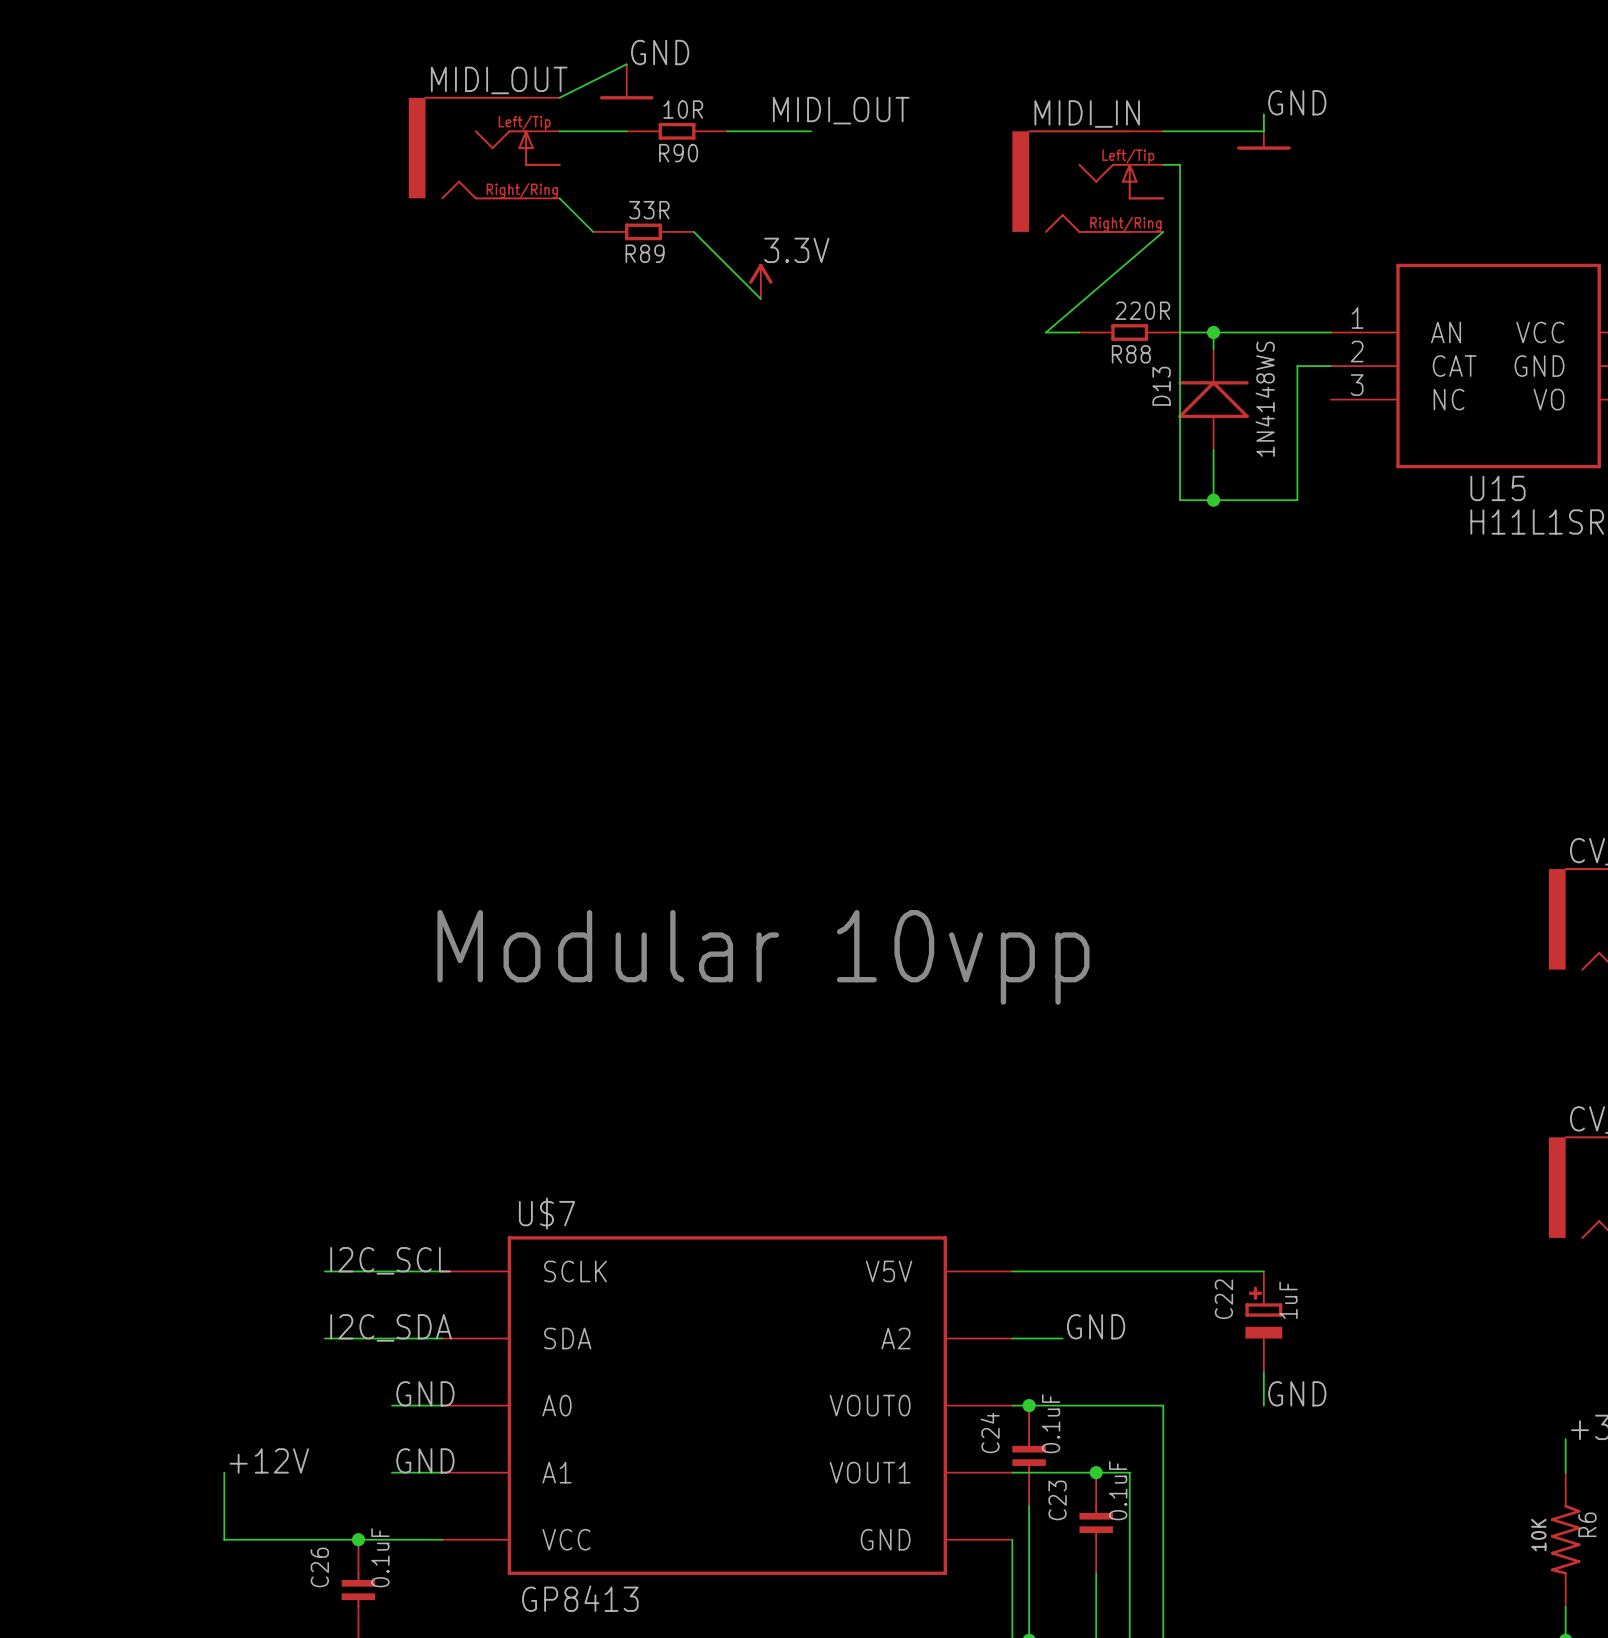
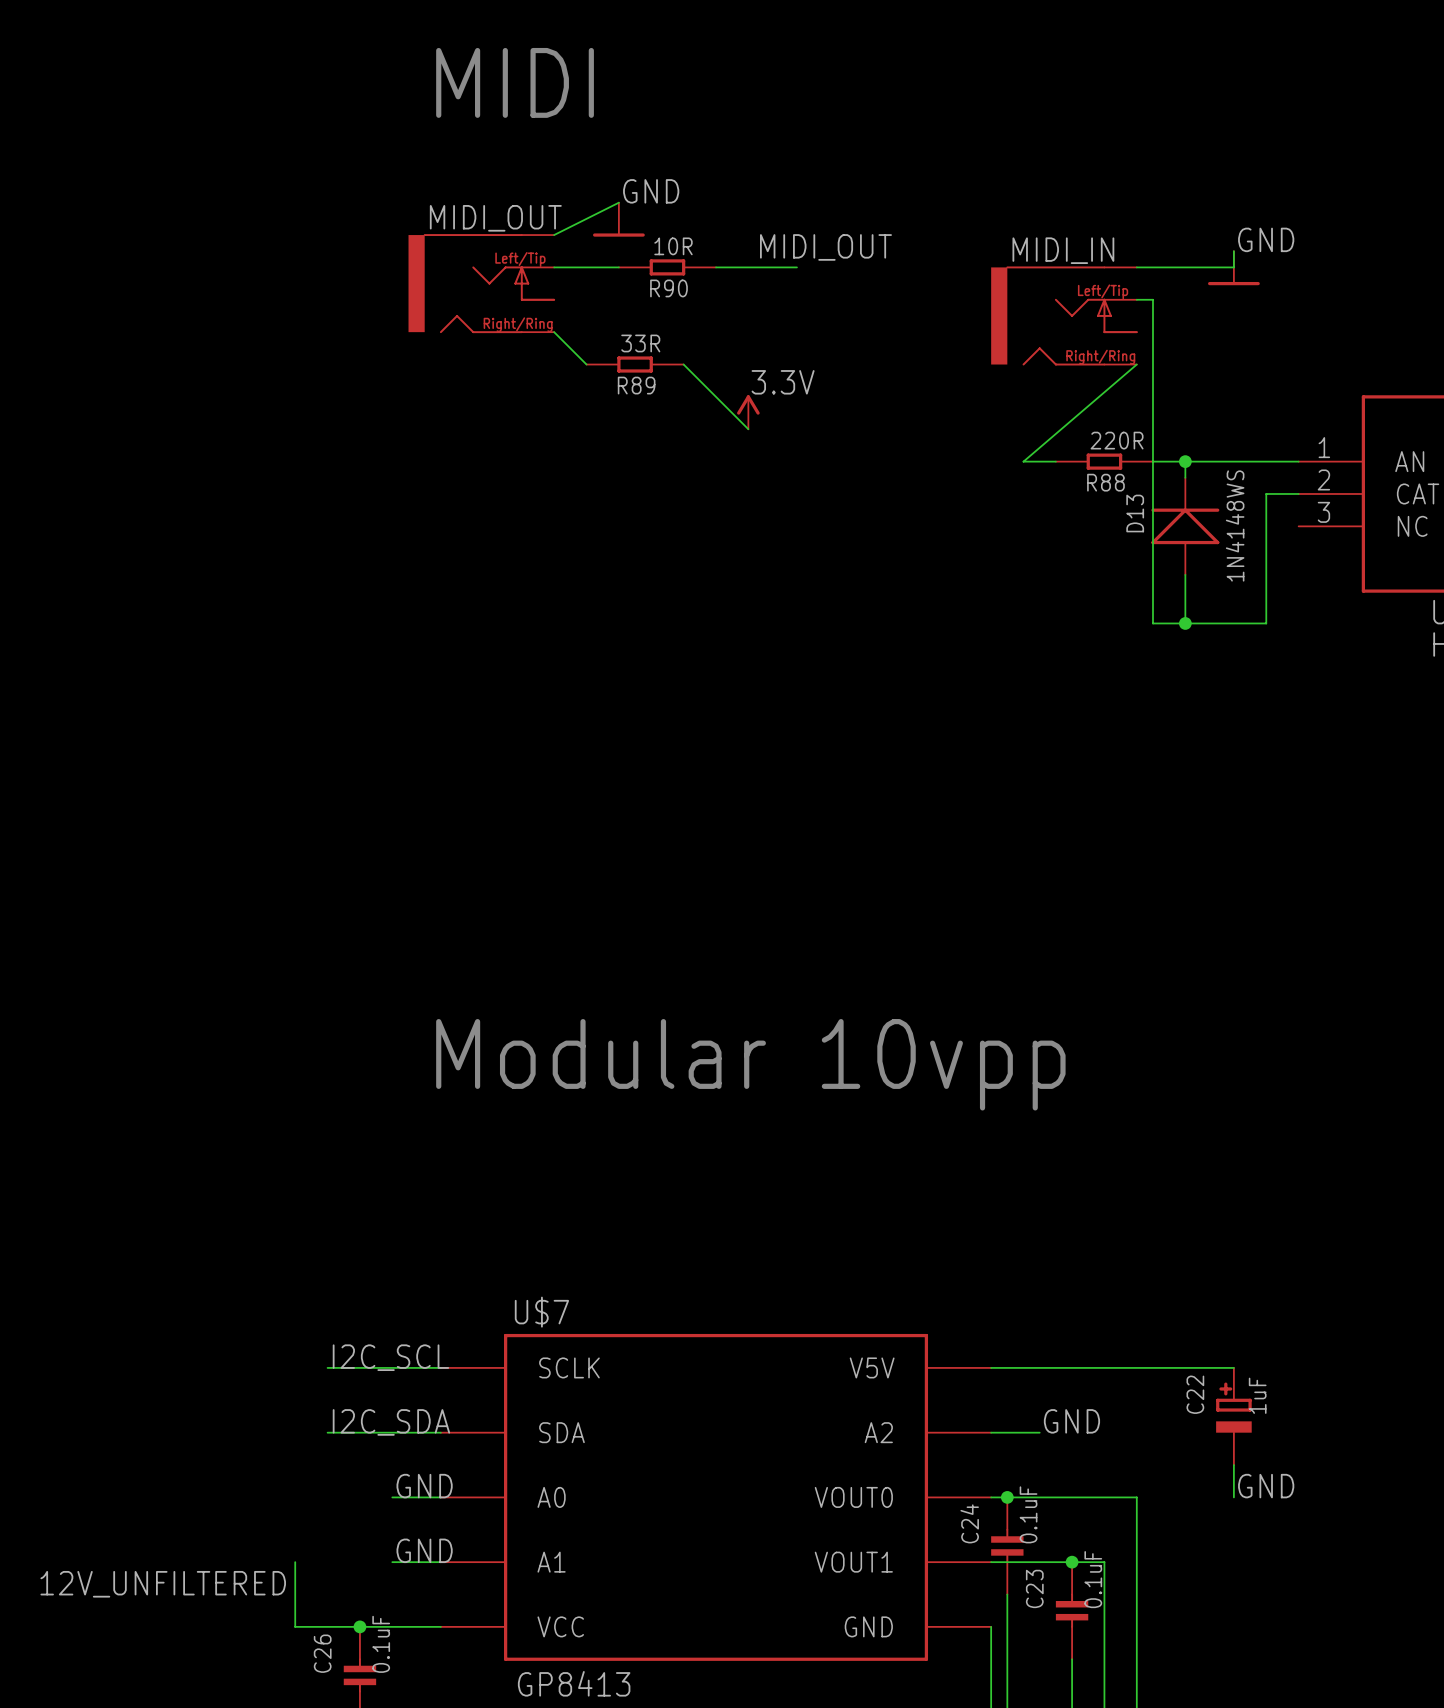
label: +12V (269, 1460) -> none
wire: (224, 1472) (224, 1539) (291, 1539) -> (295, 1562) (295, 1626)
label: none -> 12V_UNFILTERED (163, 1584)

